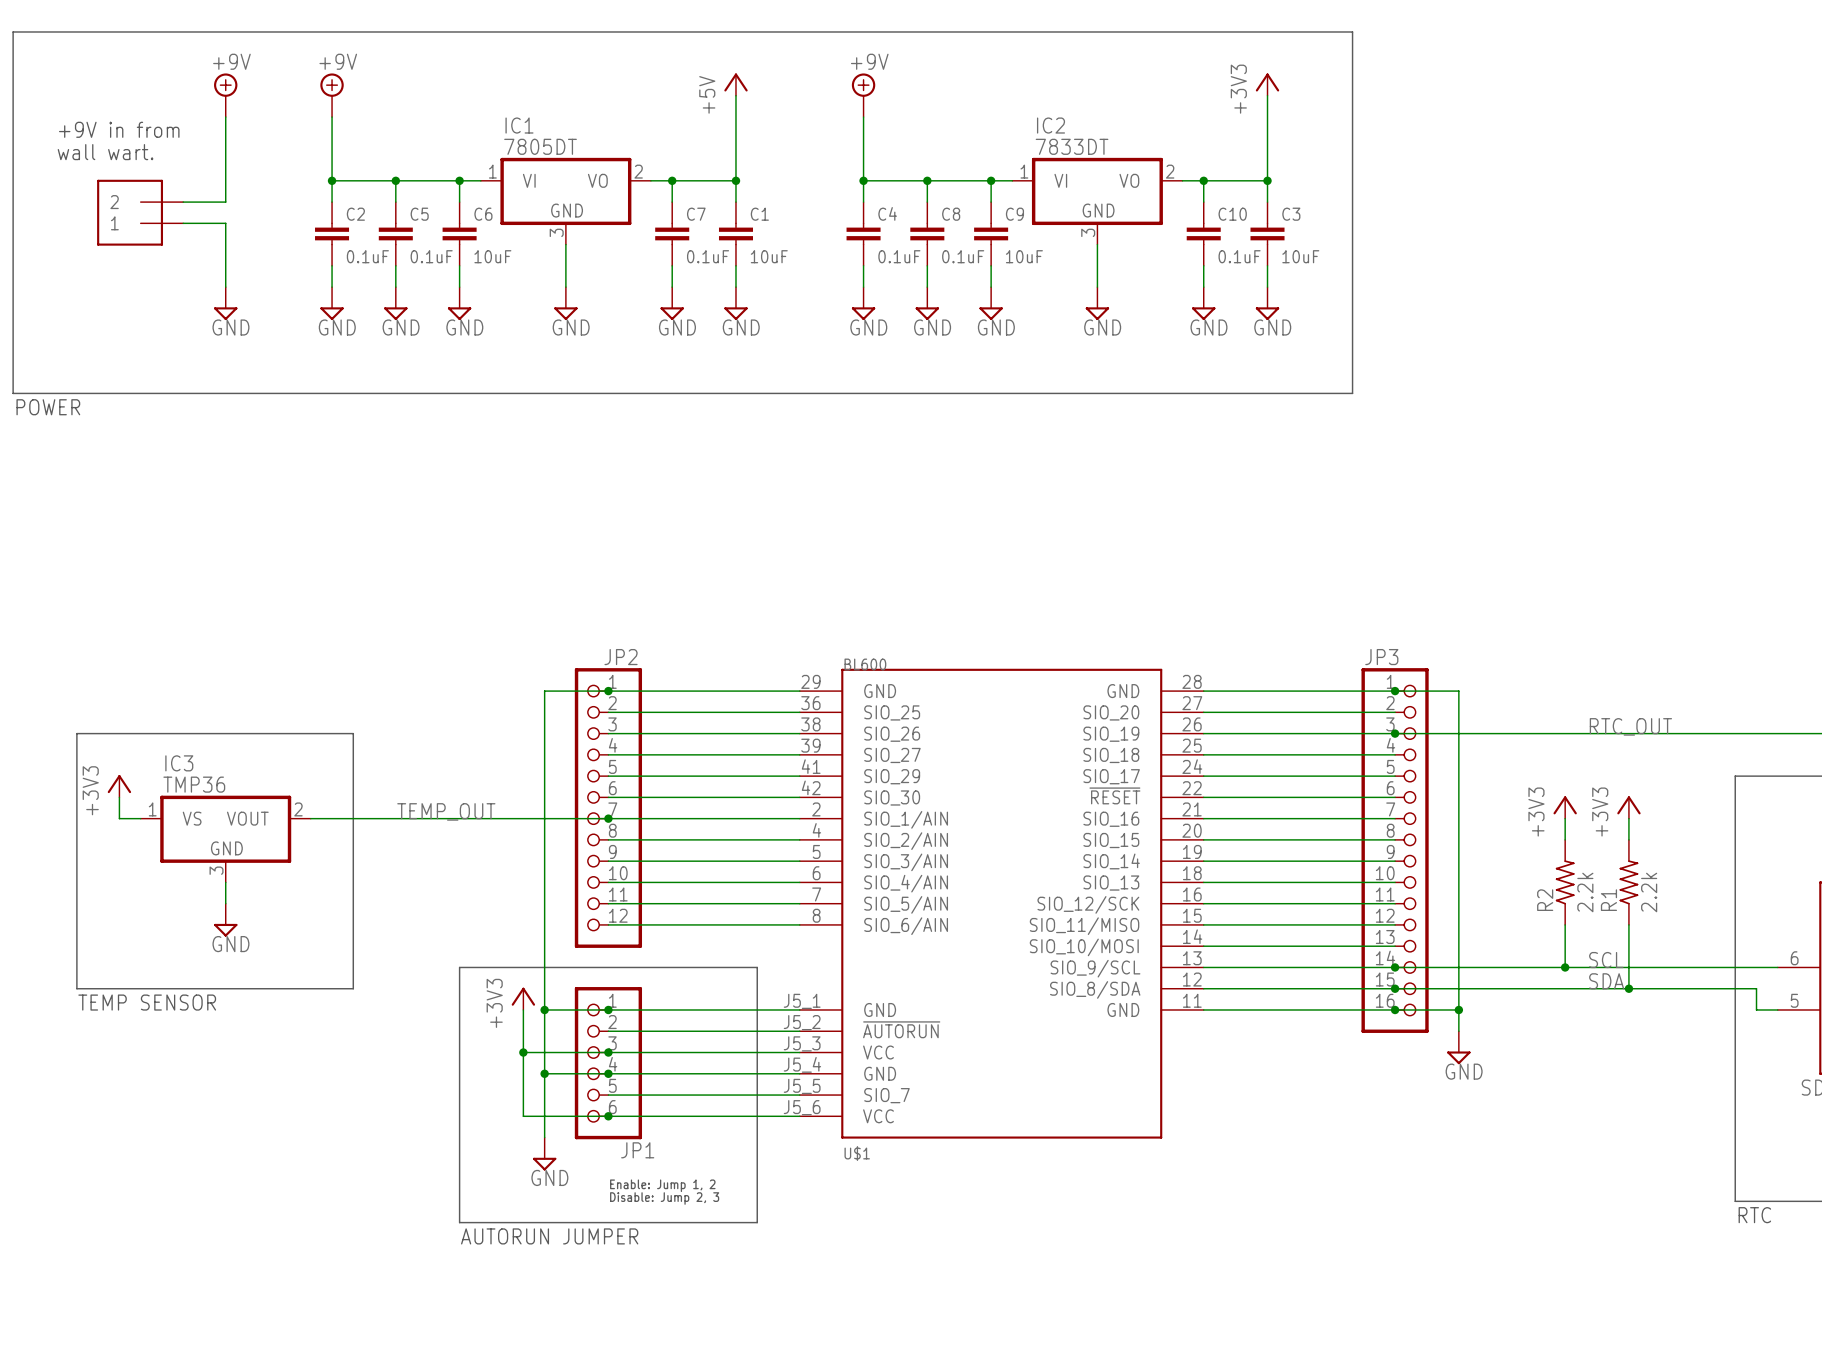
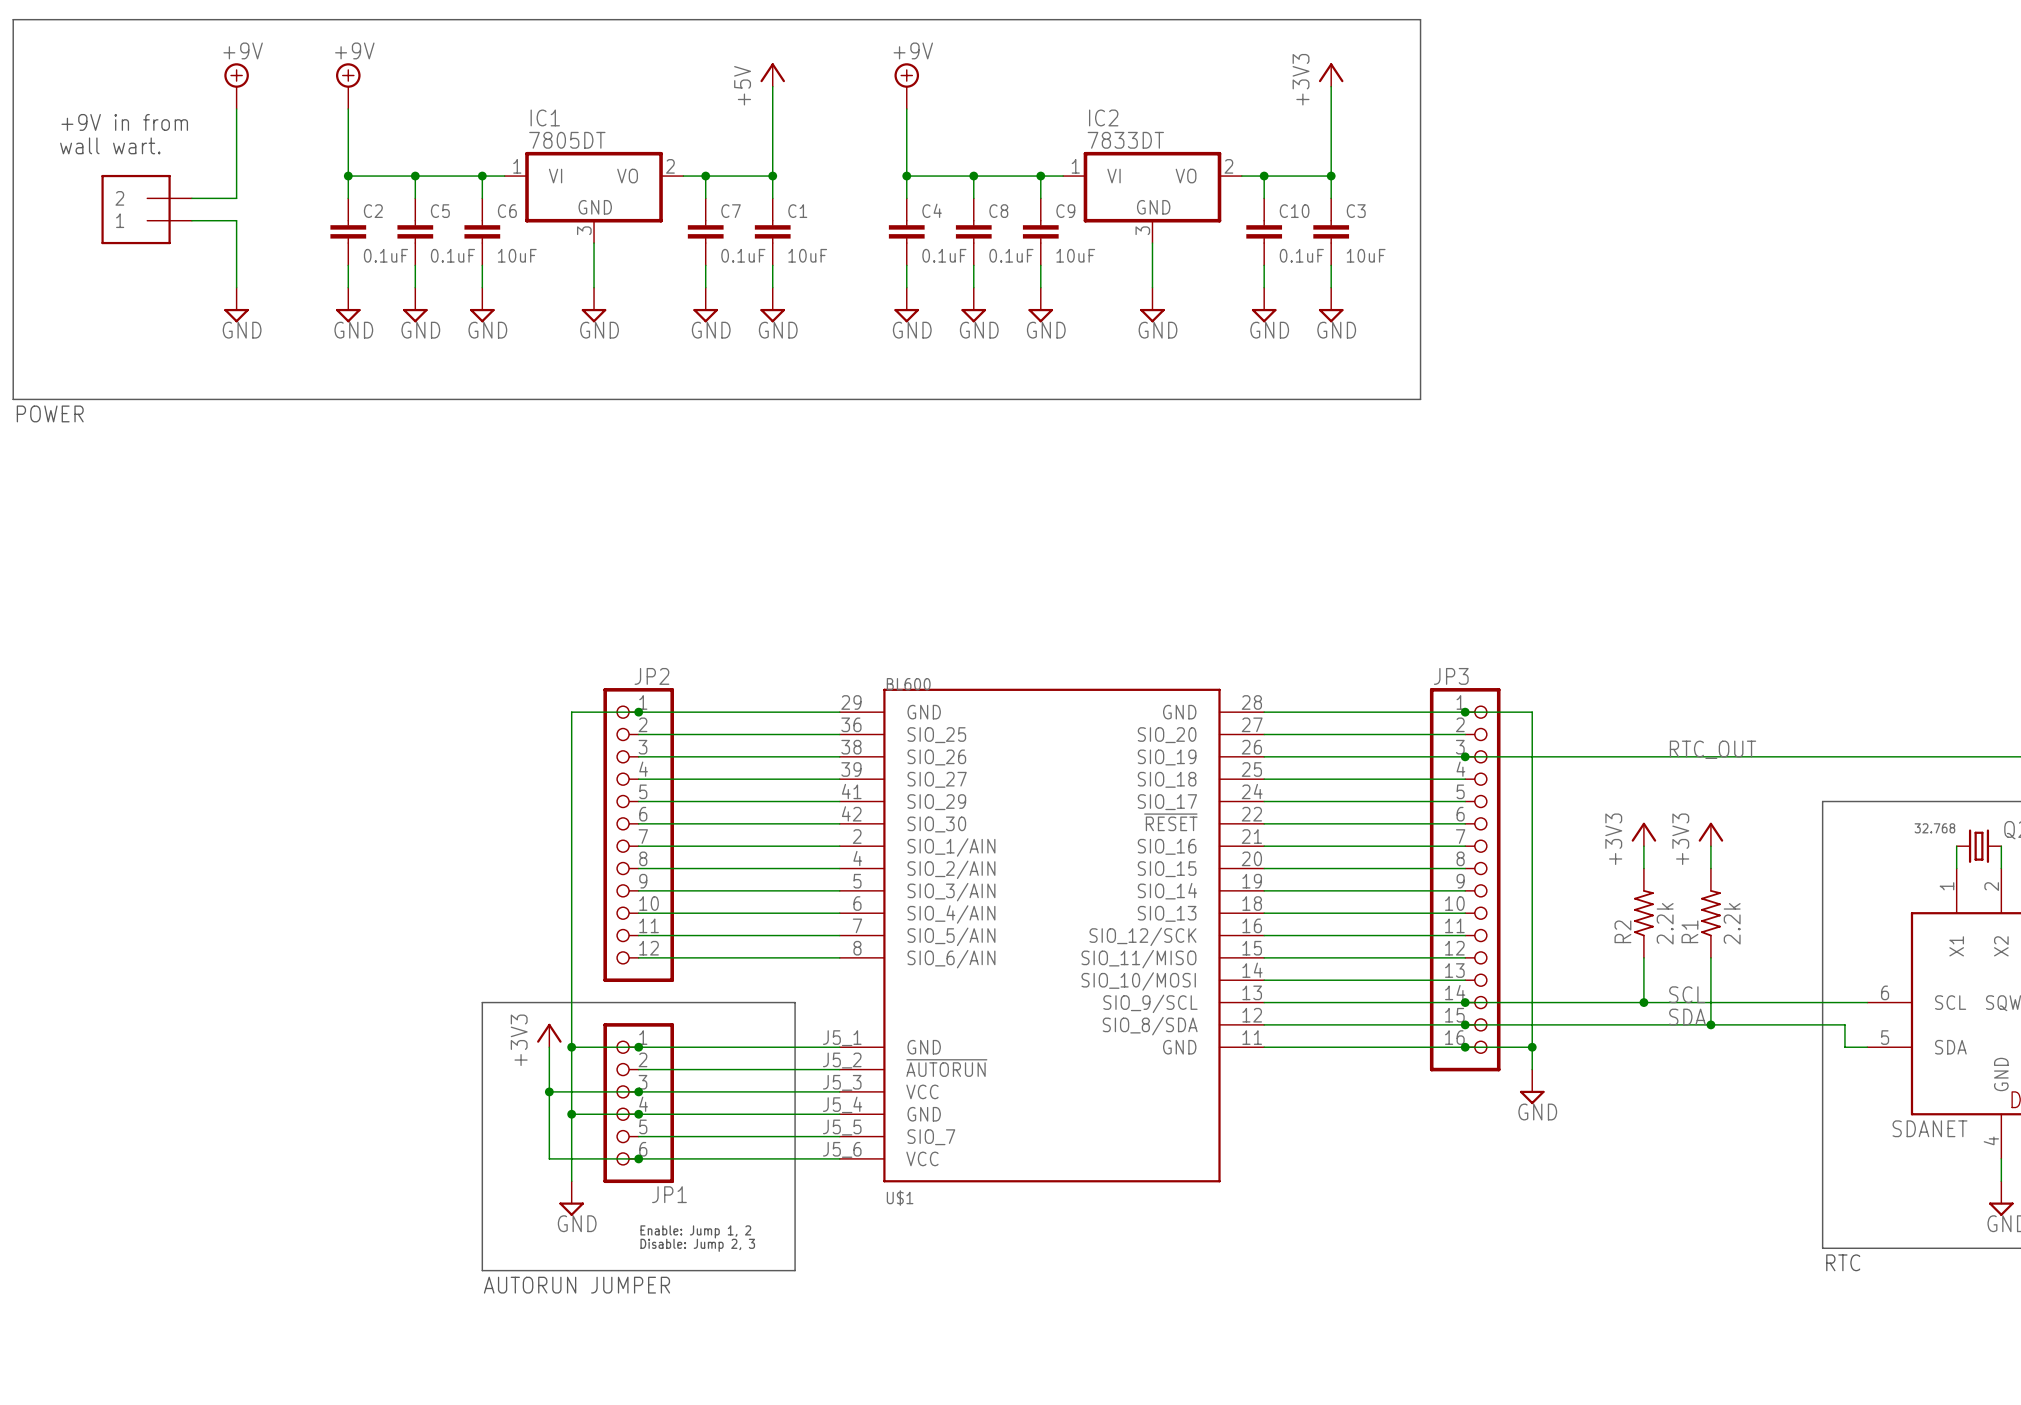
line: (76, 733) (353, 733) (353, 988) (76, 988) (76, 733) -> none
power symbol: +3V3 (119, 786) -> none
wire: (119, 797) (119, 818) (140, 818) -> none
label: TEMP_OUT (446, 811) -> none
wire: (310, 818) (608, 818) -> none
junction: (608, 818) -> none
IC3: TMP36 (225, 839) -> none
wire: (225, 882) (225, 903) -> none
power symbol: GND (225, 920) -> none
text: TEMP SENSOR (147, 1002) -> none

